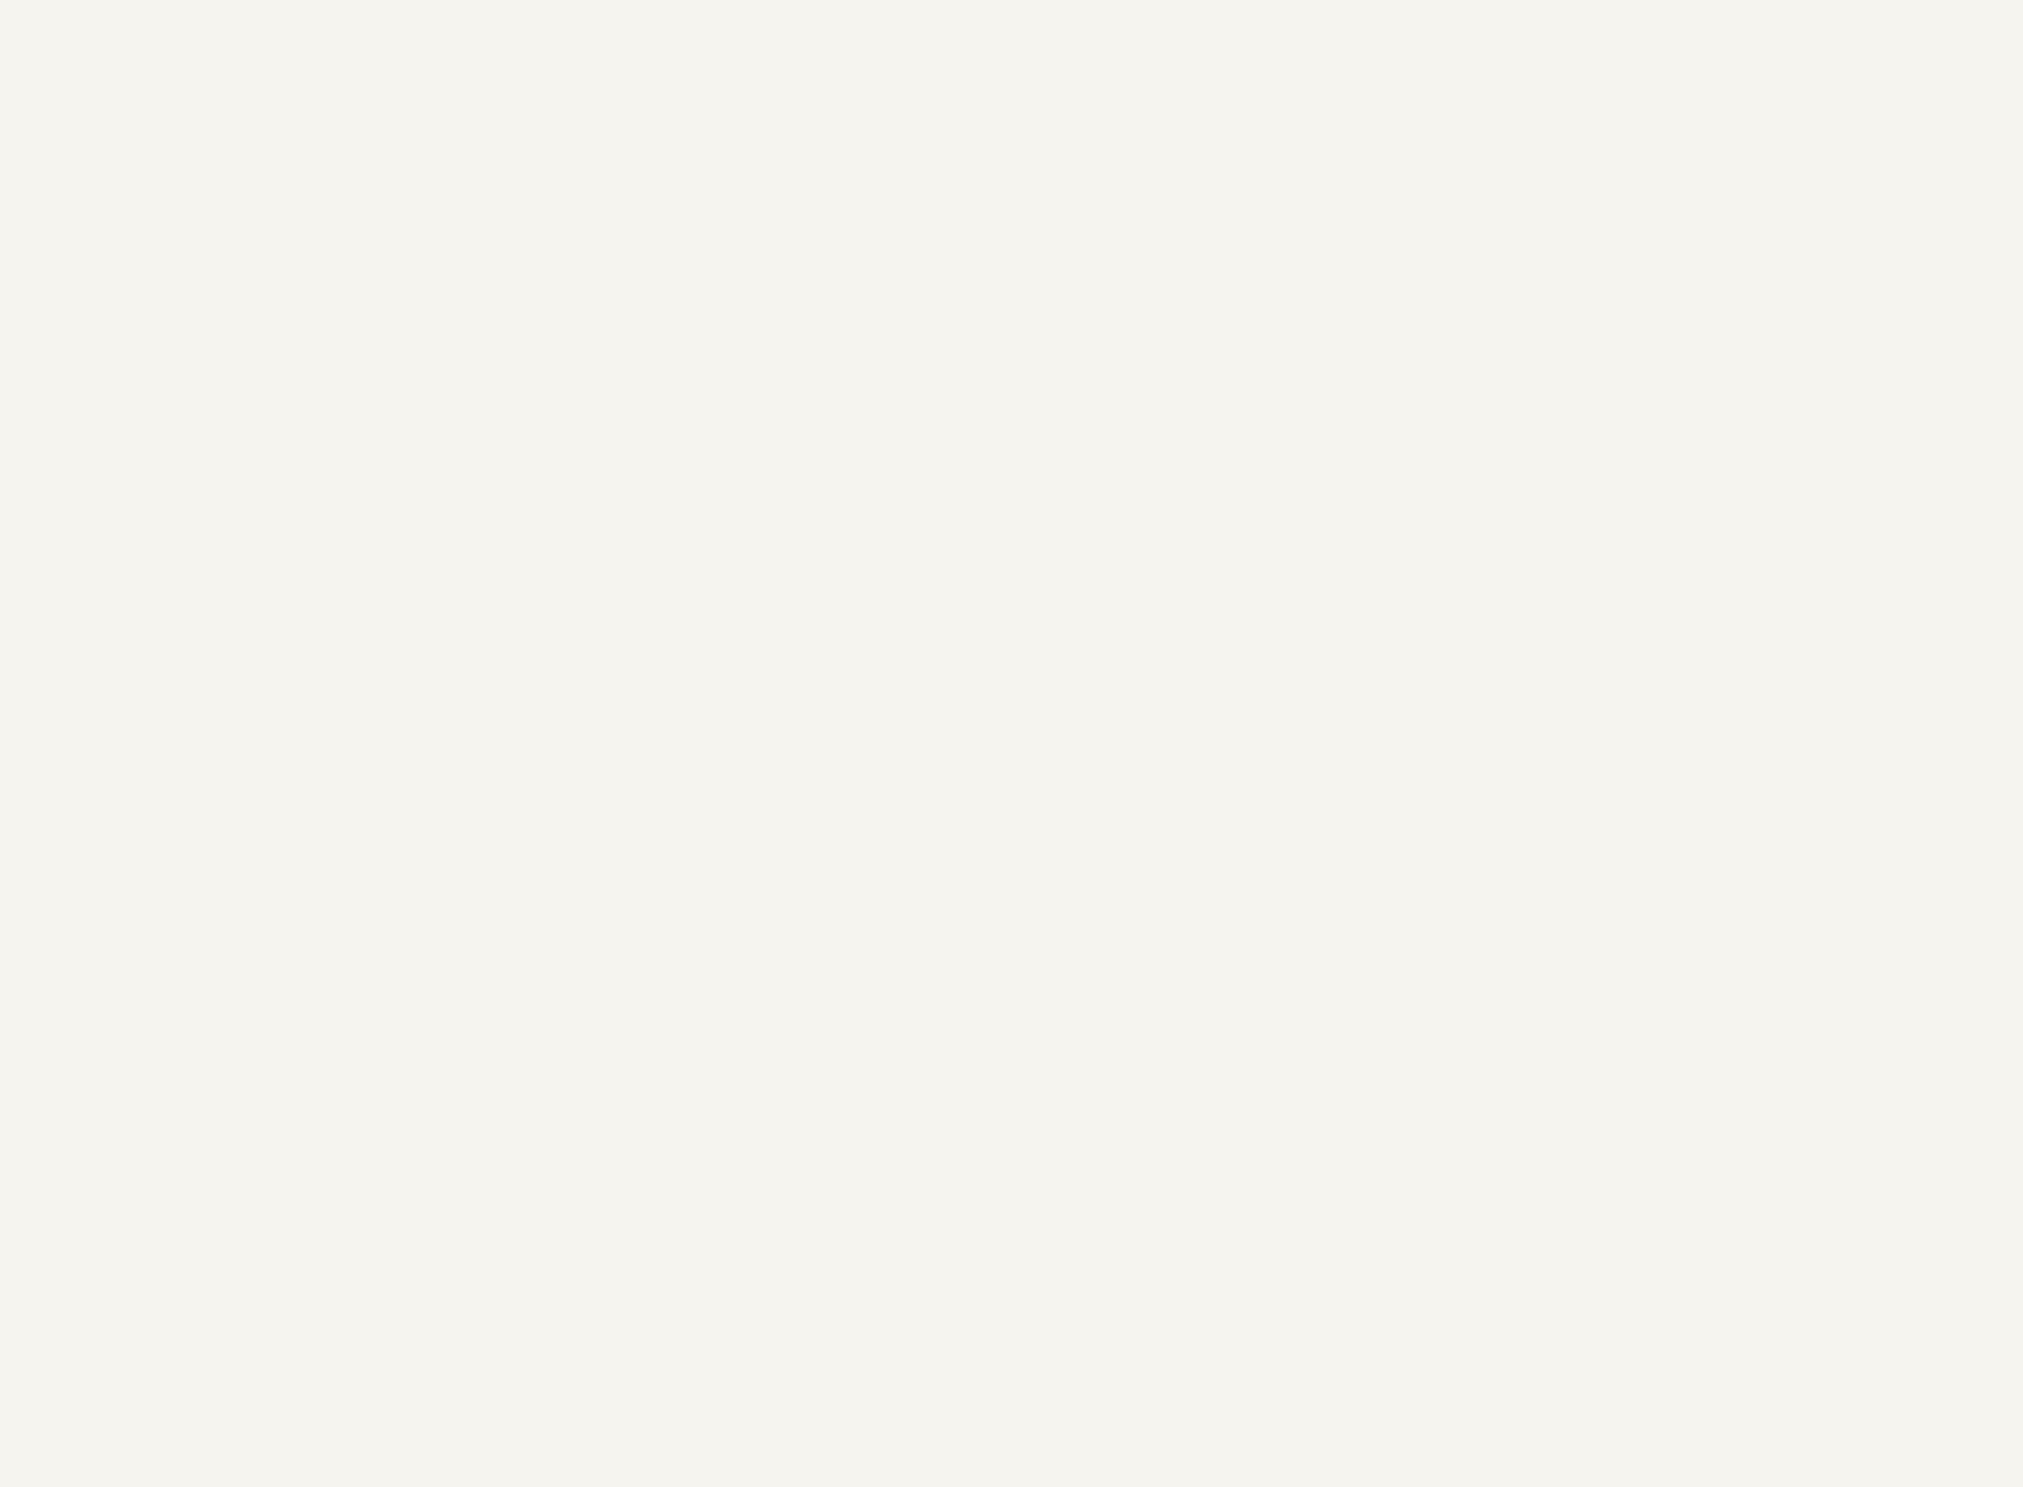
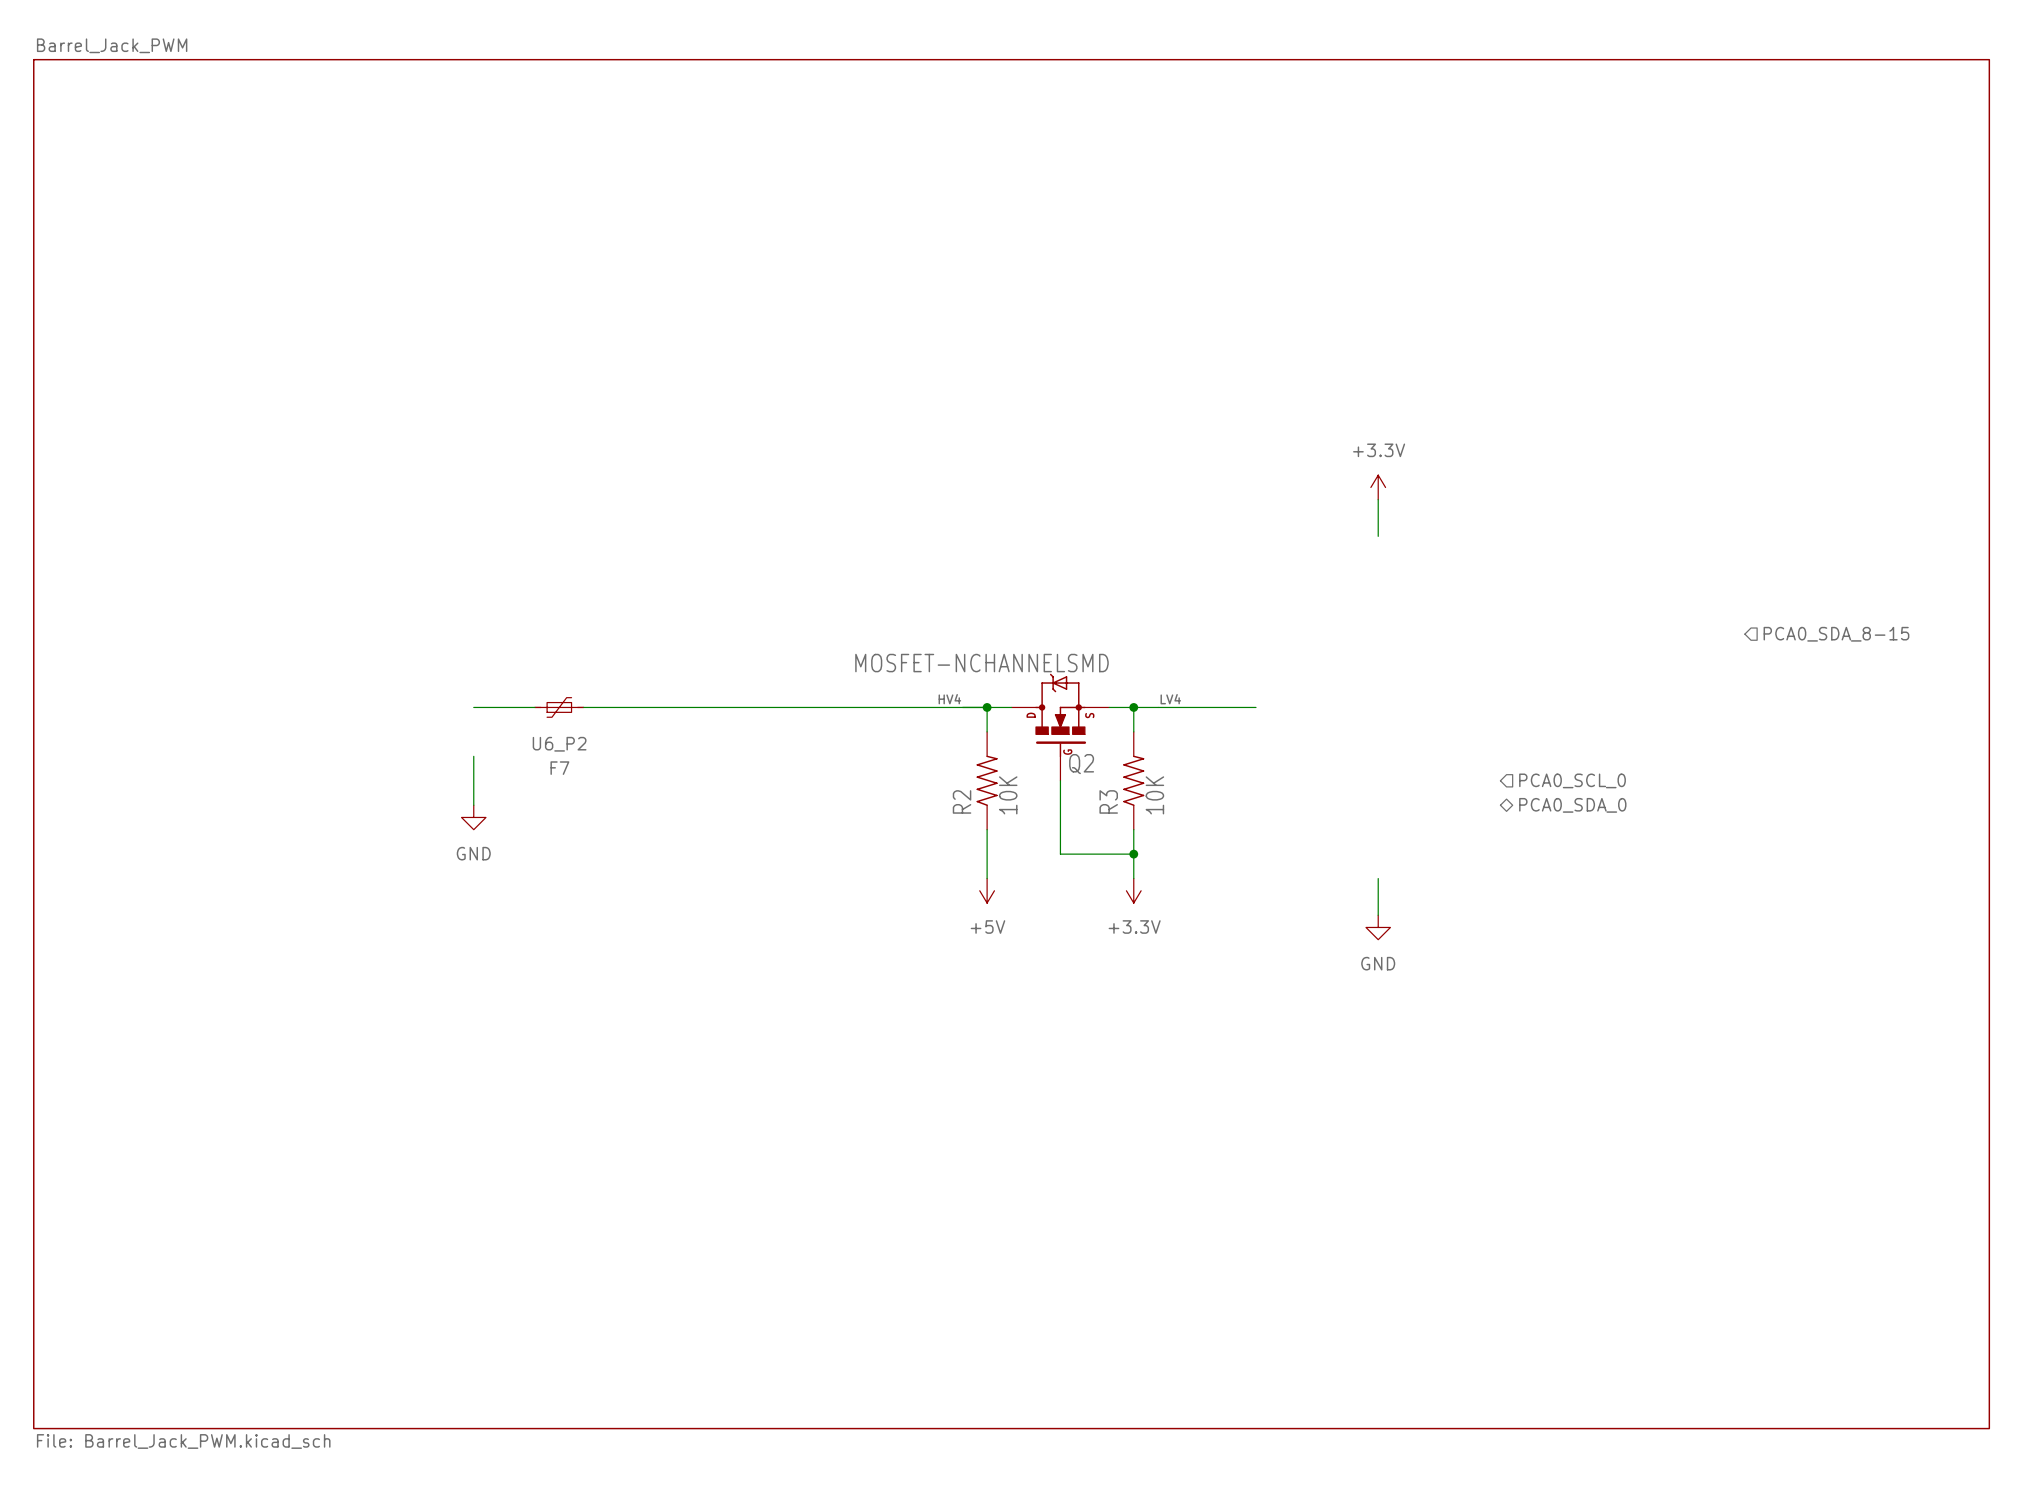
power symbol: none -> +3.3V (1378, 487)
wire: none -> (1378, 499) (1378, 536)
hierarchical label: none -> PCA0_SDA_8-15 (1836, 634)
label: none -> HV4 (949, 699)
label: none -> LV4 (1170, 699)
wire: none -> (473, 707) (534, 707)
F7: none -> U6_P2 (559, 707)
wire: none -> (583, 707) (1011, 707)
wire: none -> (987, 707) (987, 731)
junction: none -> (987, 707)
wire: none -> (1109, 707) (1255, 707)
wire: none -> (1133, 707) (1133, 731)
junction: none -> (1133, 707)
Q2: none -> MOSFET-NCHANNELSMD (1060, 727)
sheet Barrel_Jack_PWM: none -> File: Barrel_Jack_PWM.kicad_sch (1011, 744)
wire: none -> (473, 756) (473, 805)
R2: none -> 10K (987, 780)
wire: none -> (1060, 780) (1060, 854) (1133, 854)
R3: none -> 10K (1133, 780)
hierarchical label: none -> PCA0_SCL_0 (1572, 780)
hierarchical label: none -> PCA0_SDA_0 (1572, 805)
power symbol: none -> GND (473, 817)
wire: none -> (987, 829) (987, 878)
wire: none -> (1133, 829) (1133, 878)
junction: none -> (1133, 854)
wire: none -> (1378, 878) (1378, 915)
power symbol: none -> +5V (987, 890)
power symbol: none -> +3.3V (1133, 890)
power symbol: none -> GND (1378, 927)

